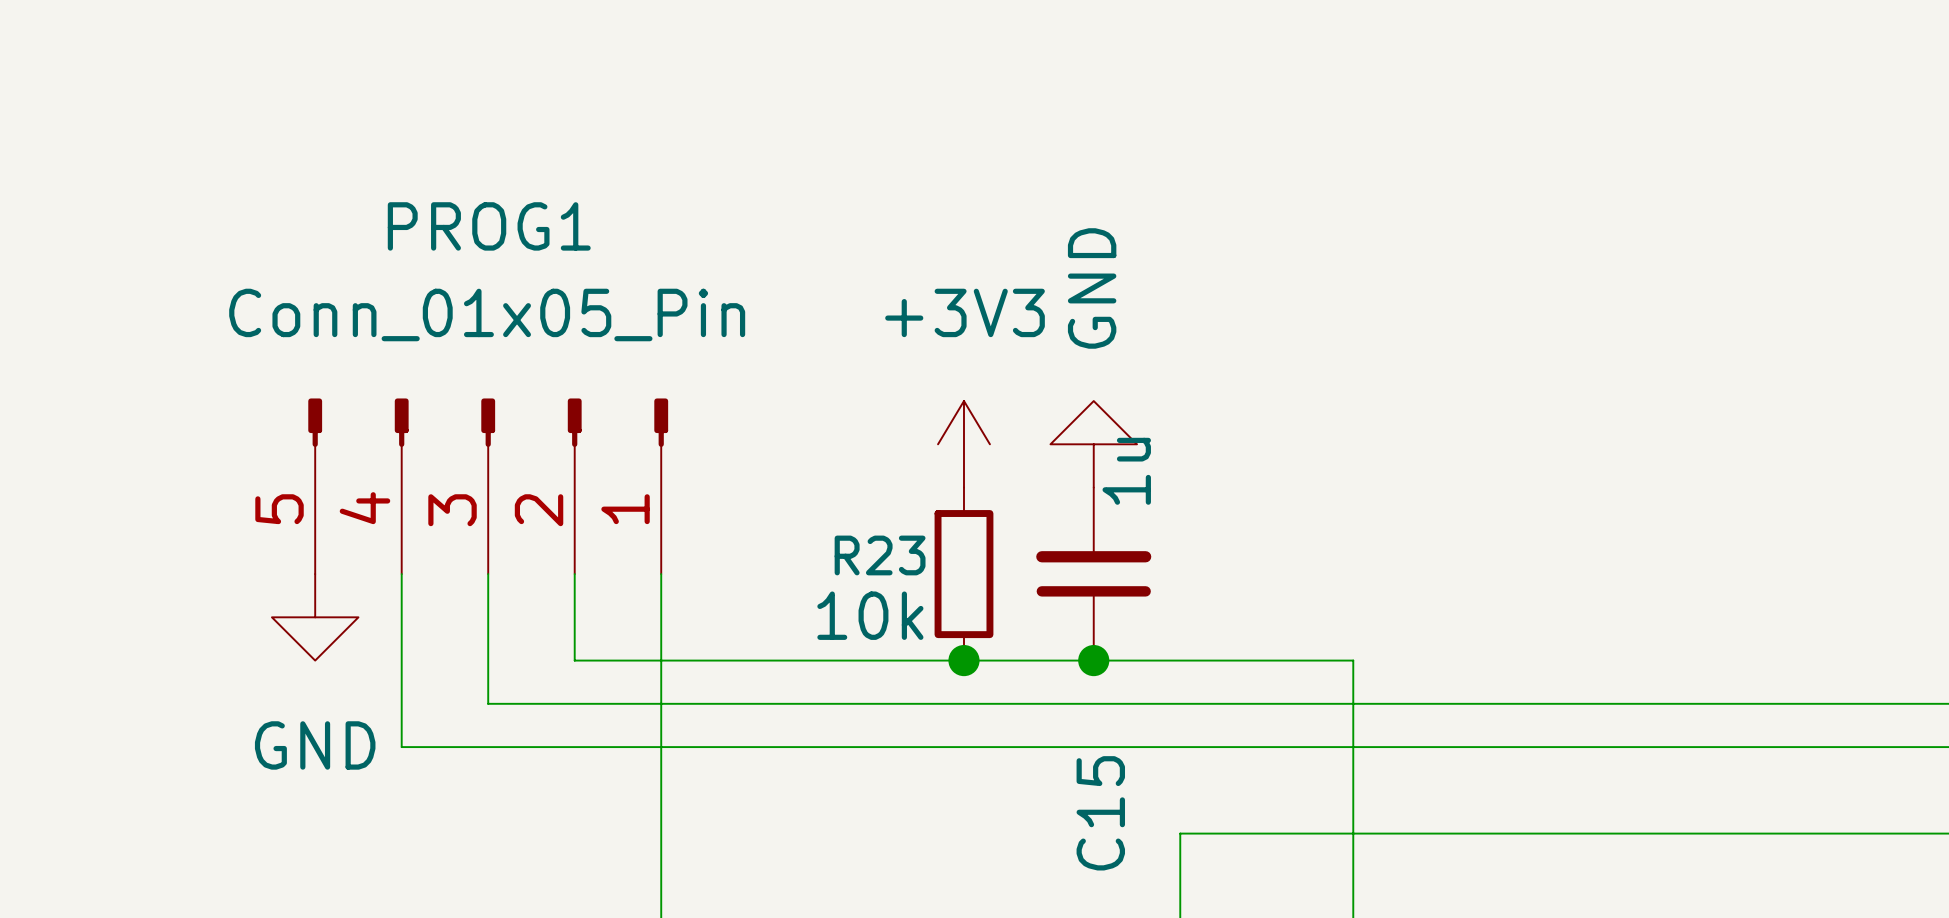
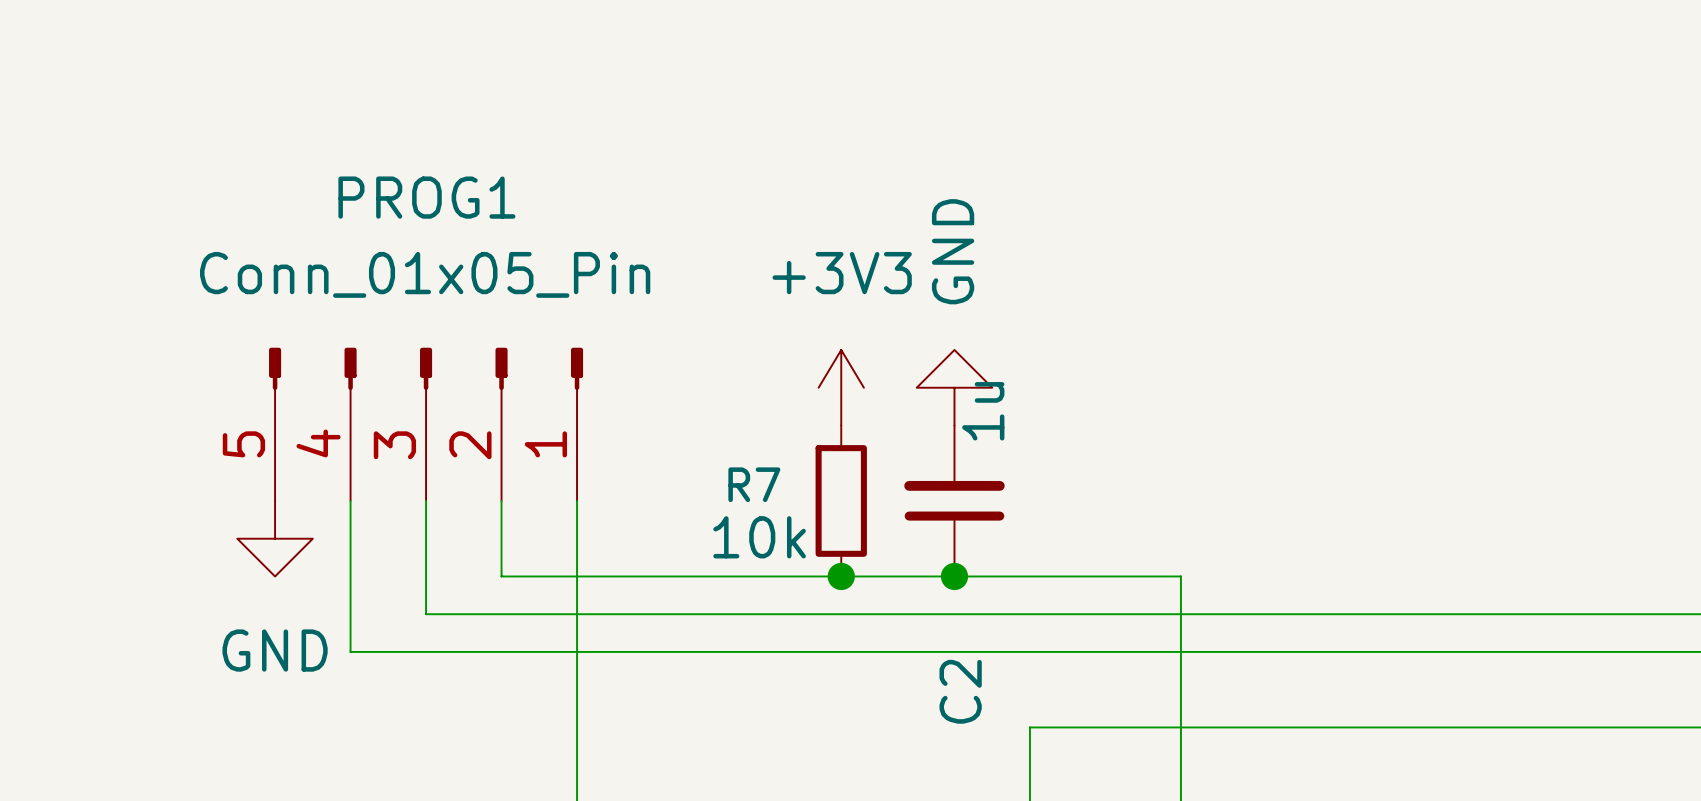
R23 name: R23 (880, 555) -> R7 (754, 484)
C15 name: C15 (1100, 813) -> C2 (960, 691)

